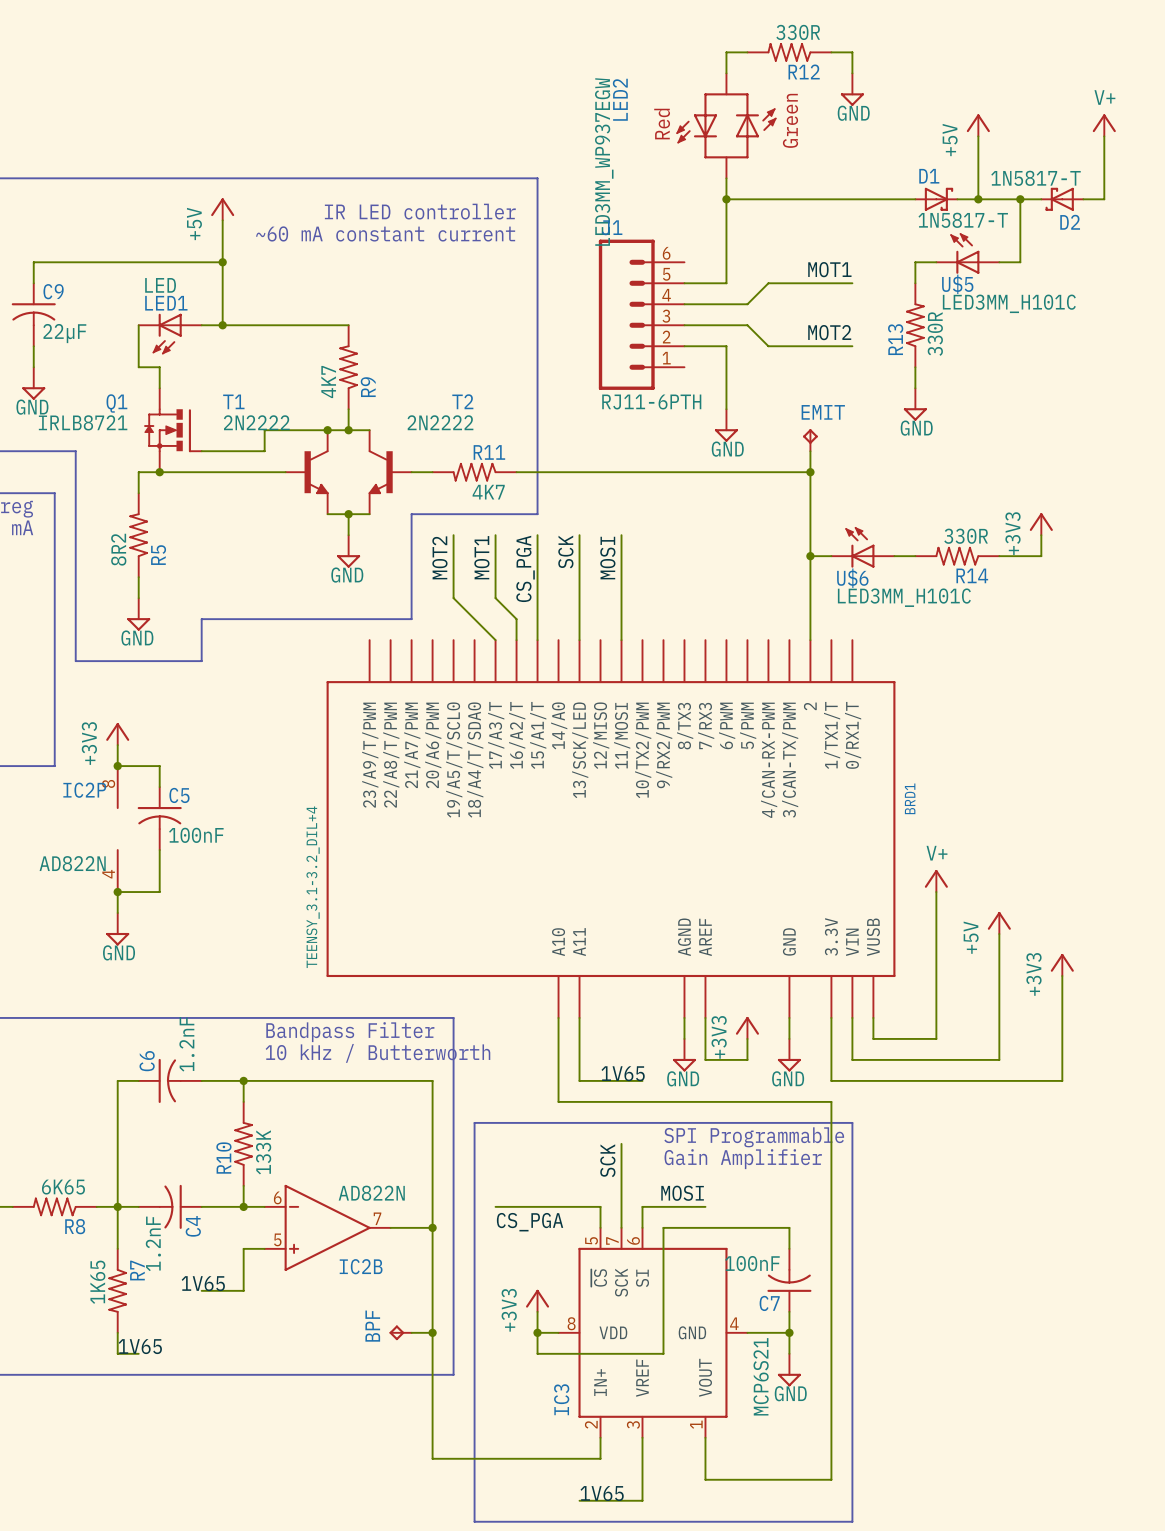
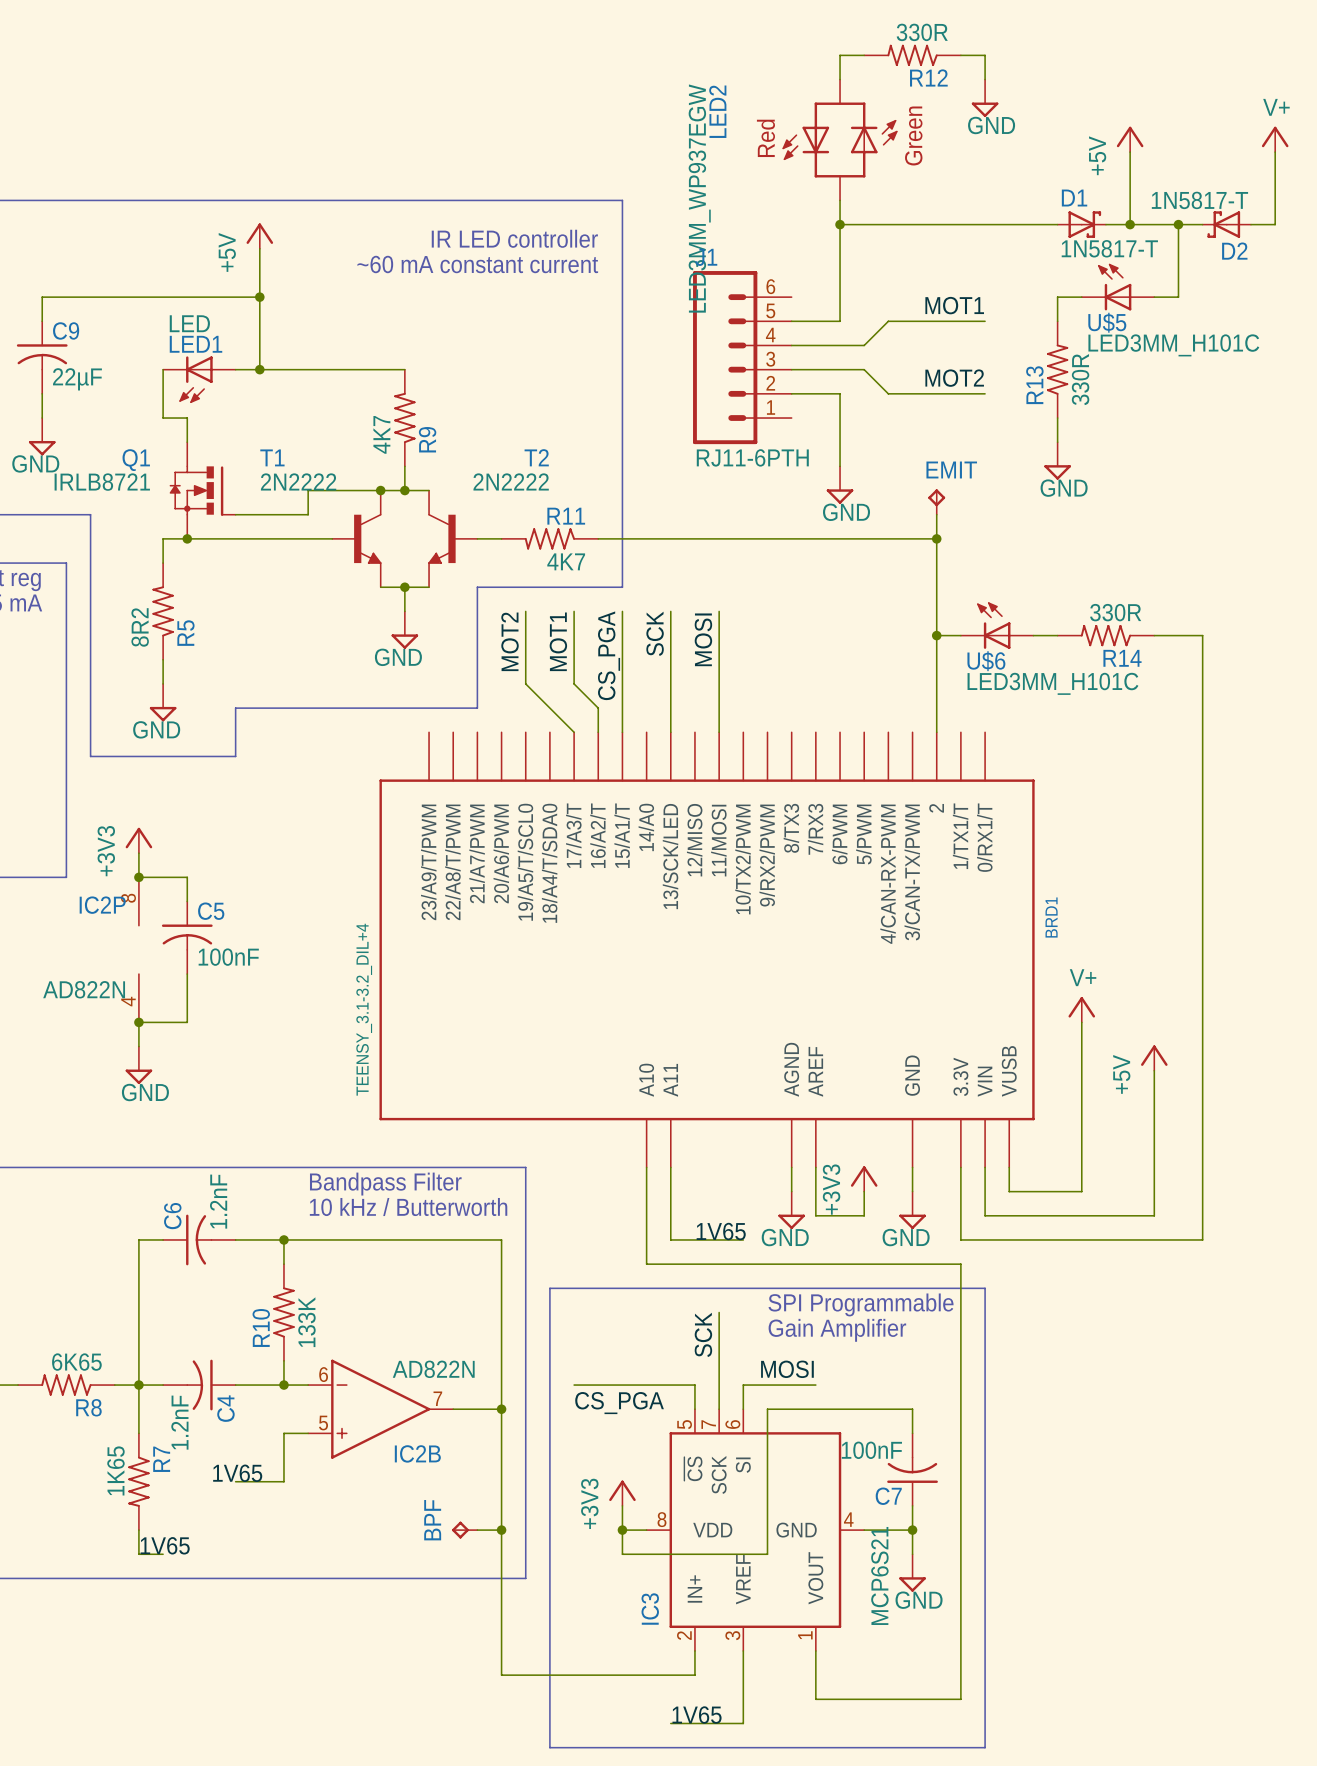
power symbol: +3V3 (1041, 524) -> none
wire: (1041, 535) (1041, 556) -> none
power symbol: +3V3 (1062, 964) -> none
wire: (1062, 975) (1062, 1080) (1041, 1080) -> (1202, 635) (1202, 1239)

